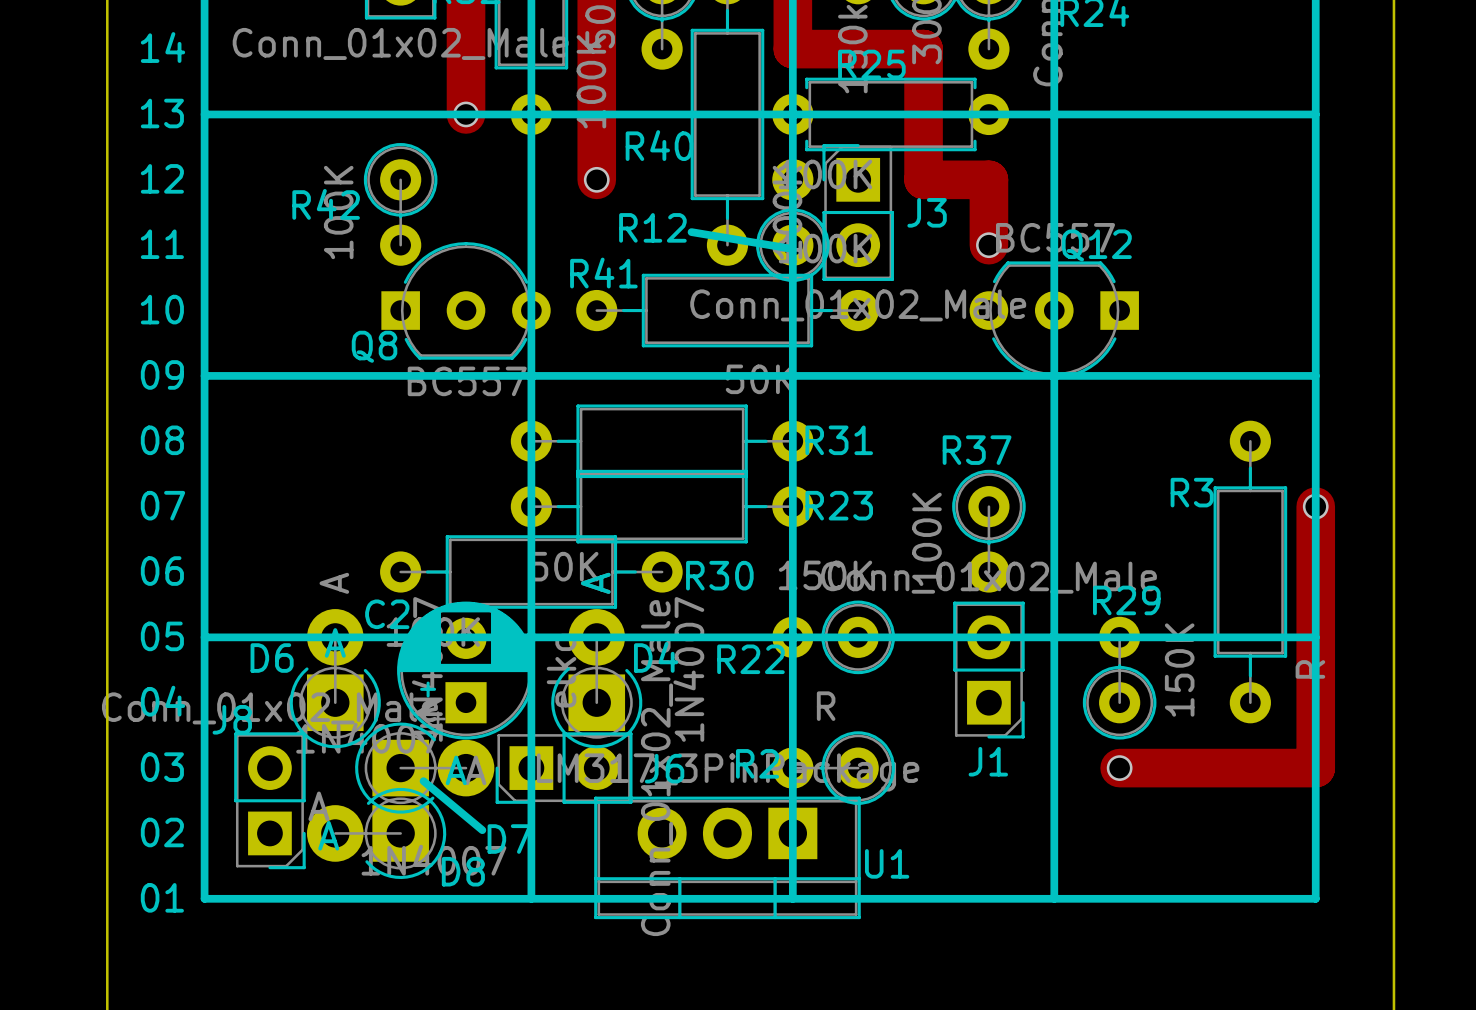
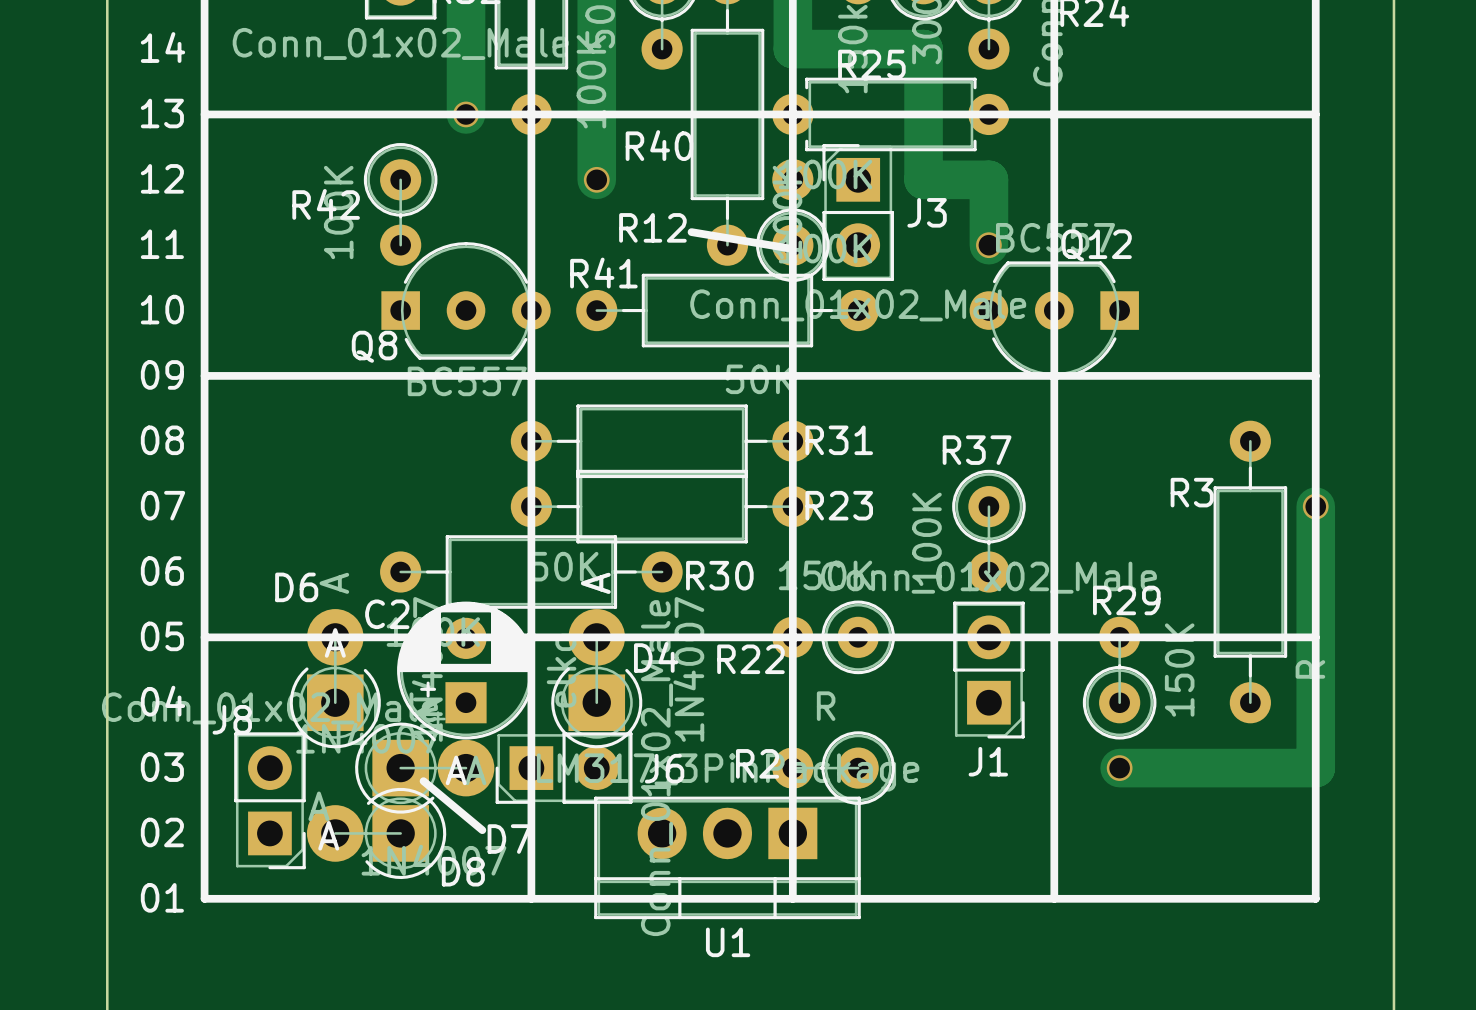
D6 name position: D6 (272, 658) -> D6 (296, 587)
U1 name position: U1 (887, 863) -> U1 (728, 942)

